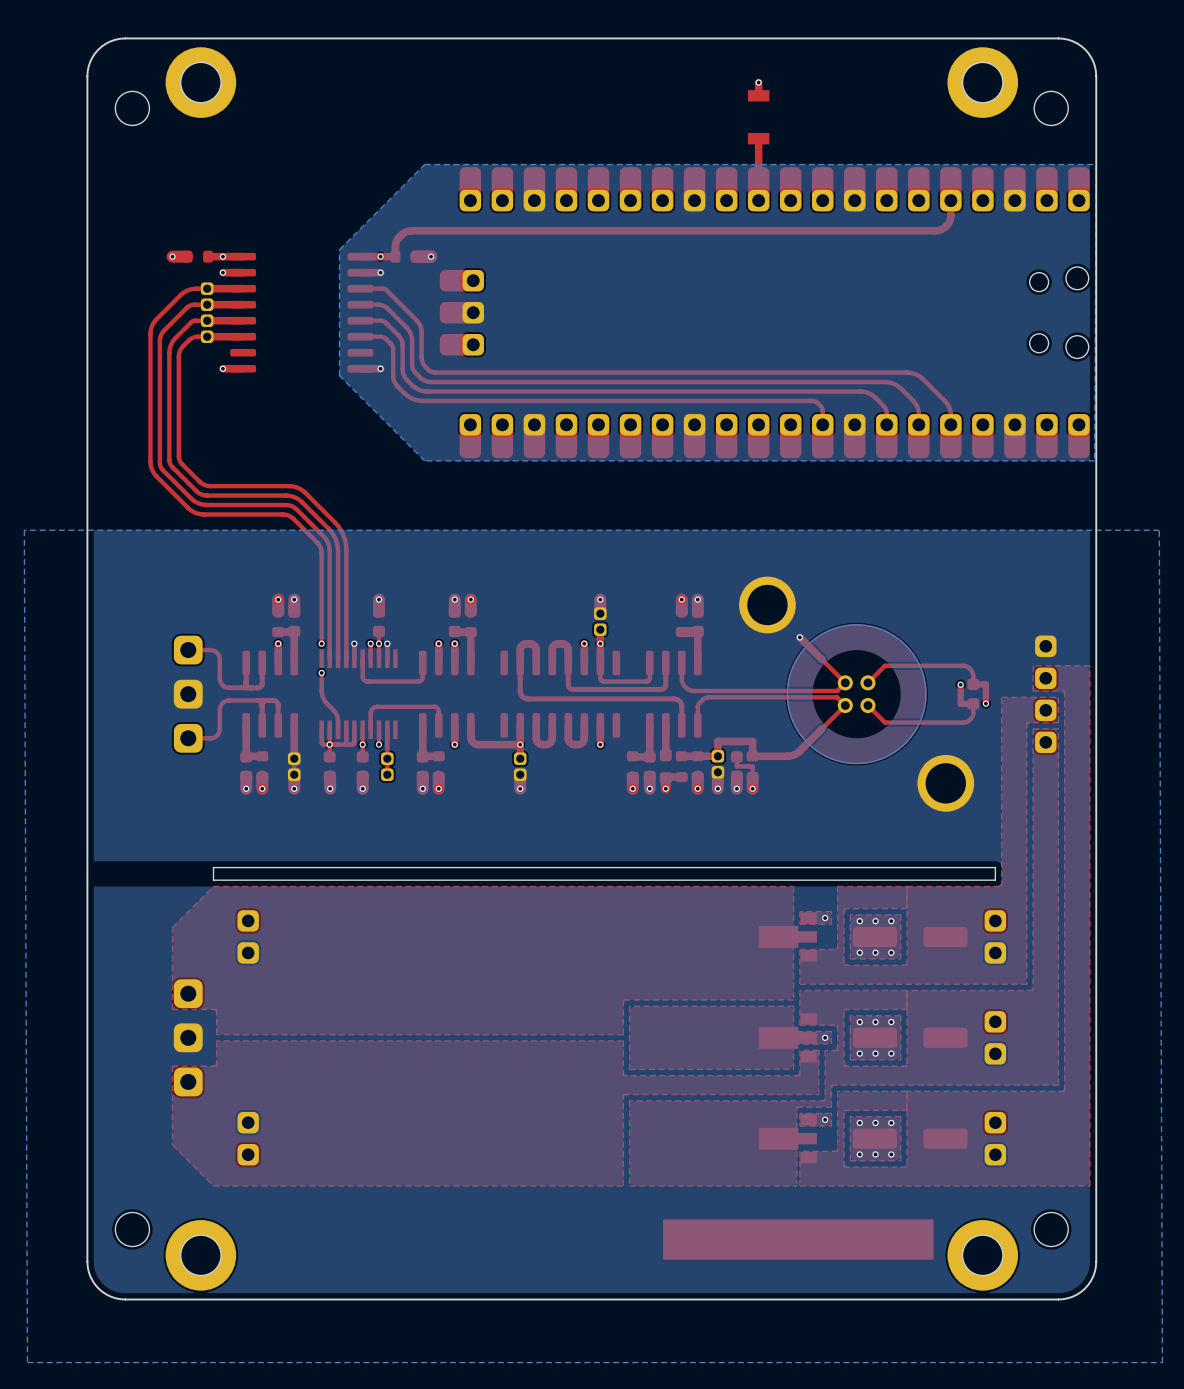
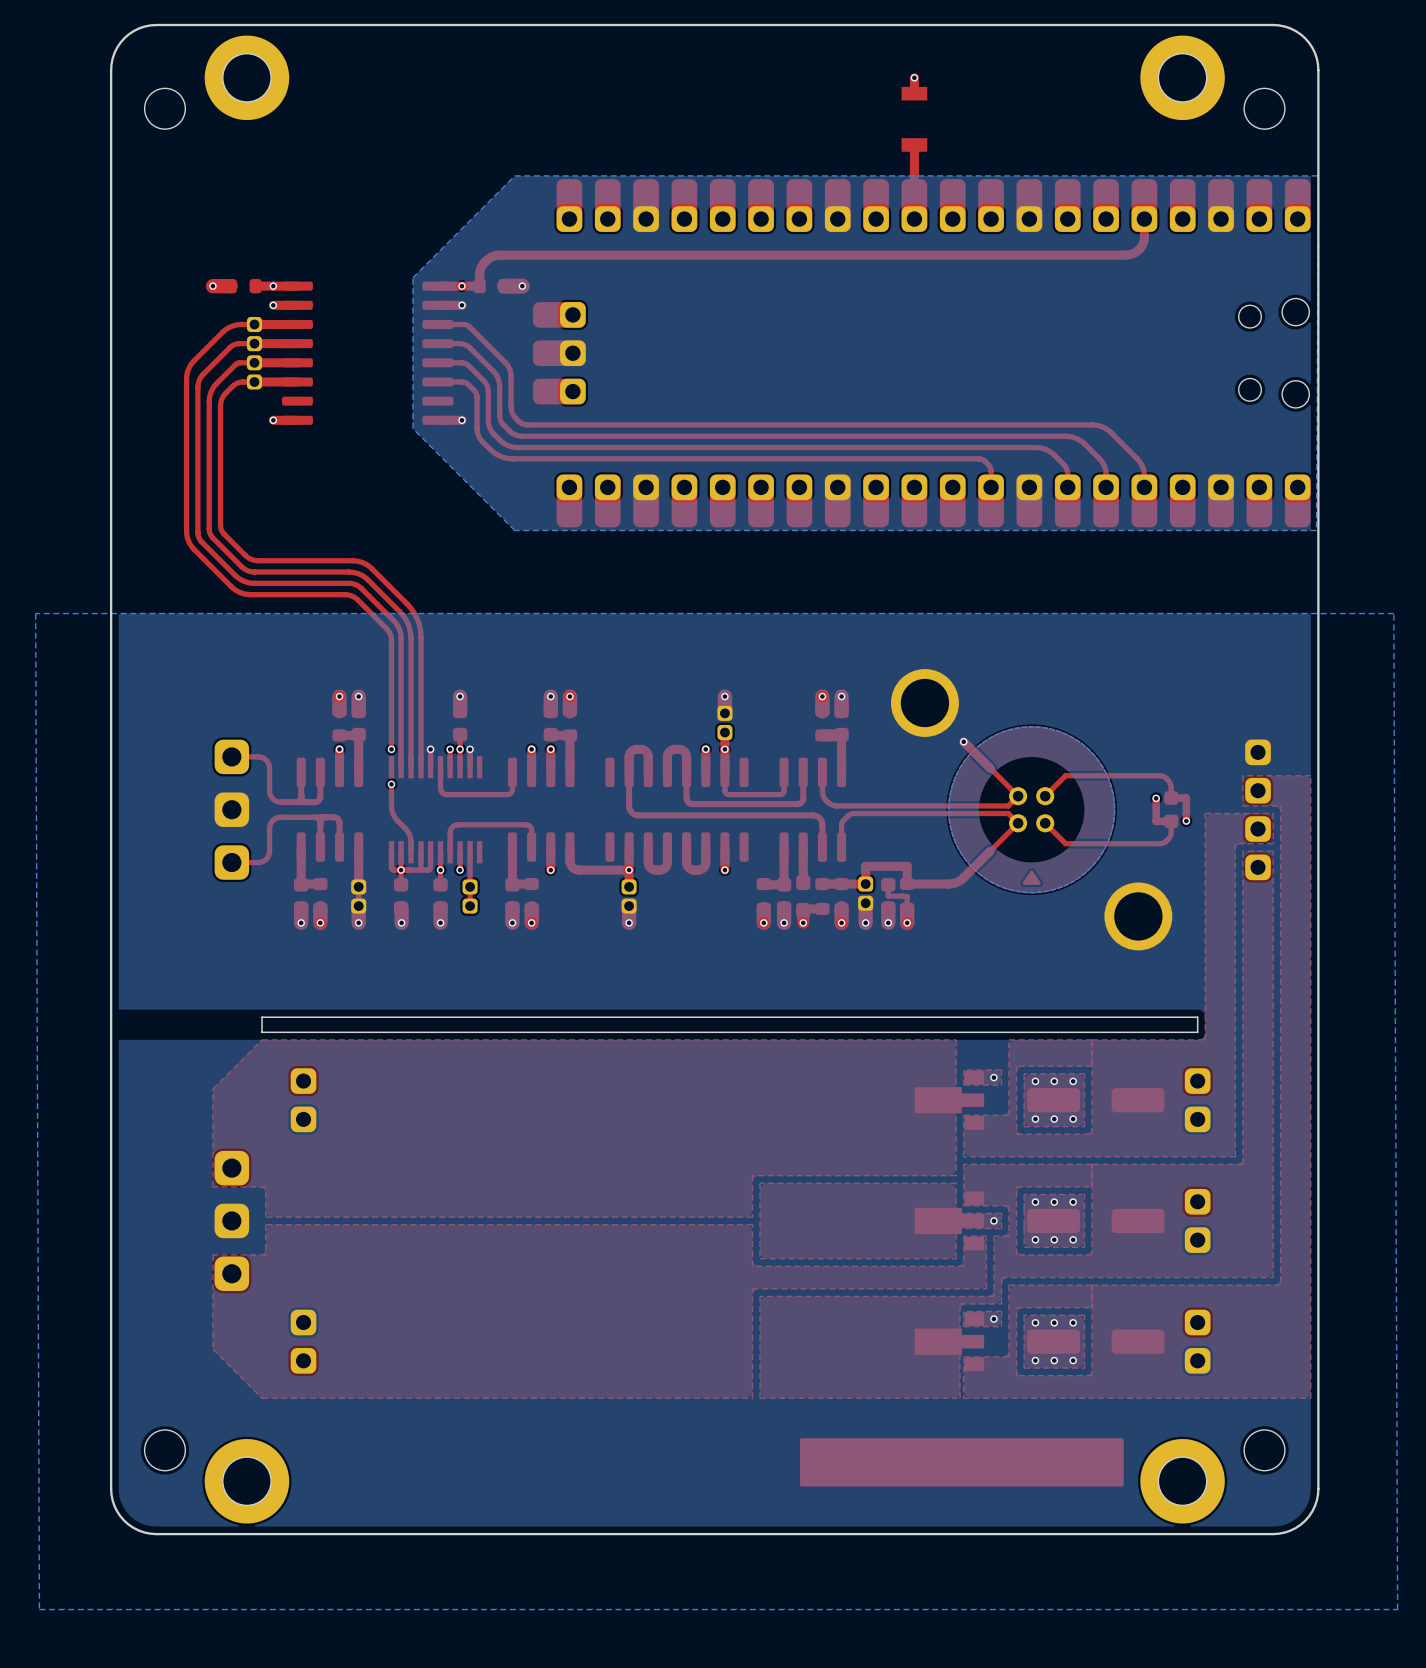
drawing: none -> [1022, 870, 1041, 885]

